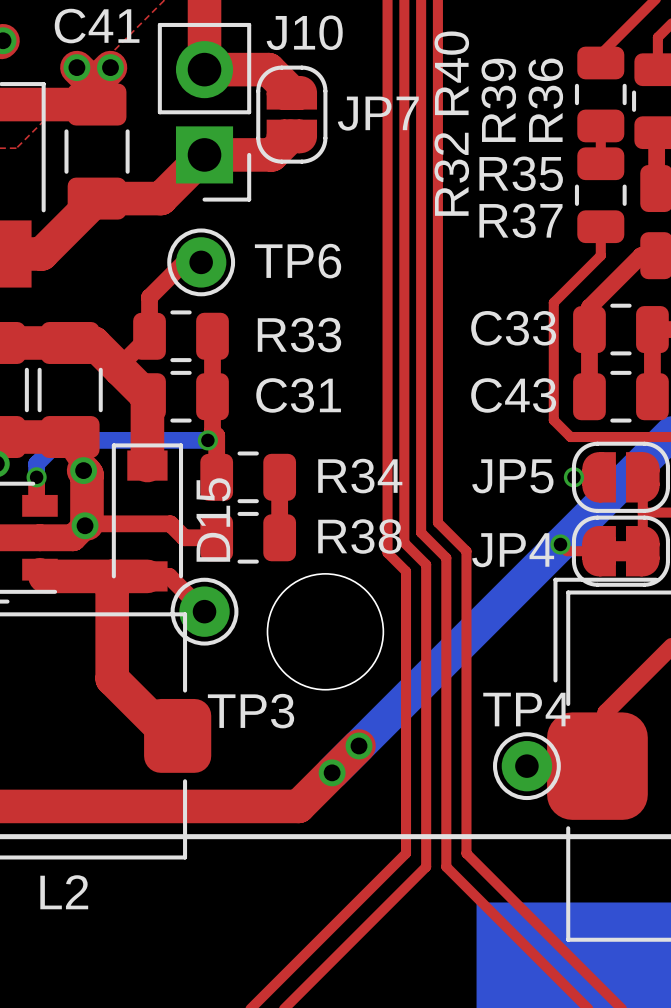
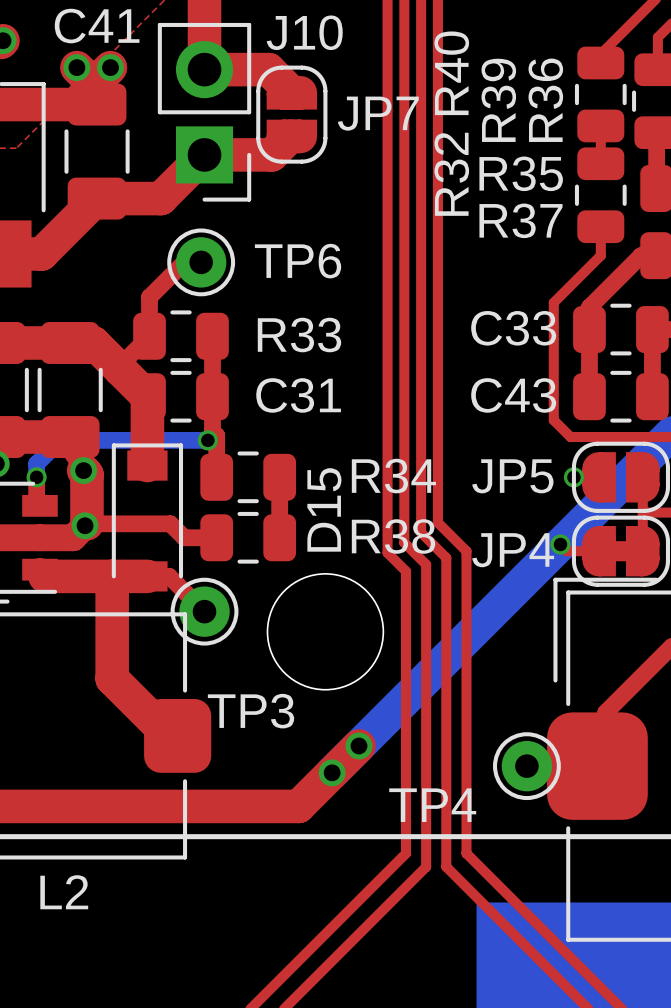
R34 name position: R34 (360, 476) -> R34 (393, 476)
D15 name position: D15 (213, 520) -> D15 (324, 509)
R38 name position: R38 (359, 536) -> R38 (393, 536)
TP4 name position: TP4 (526, 709) -> TP4 (432, 805)

